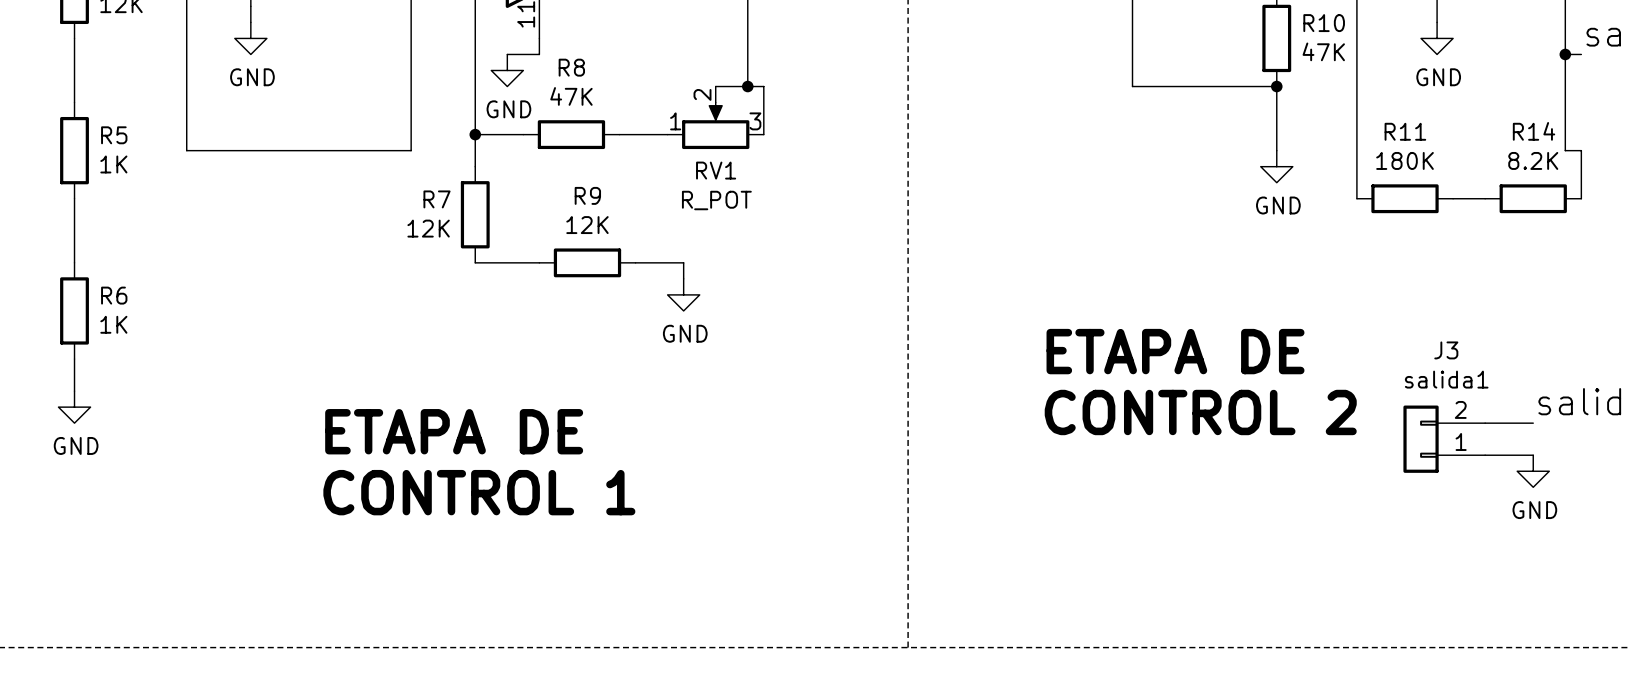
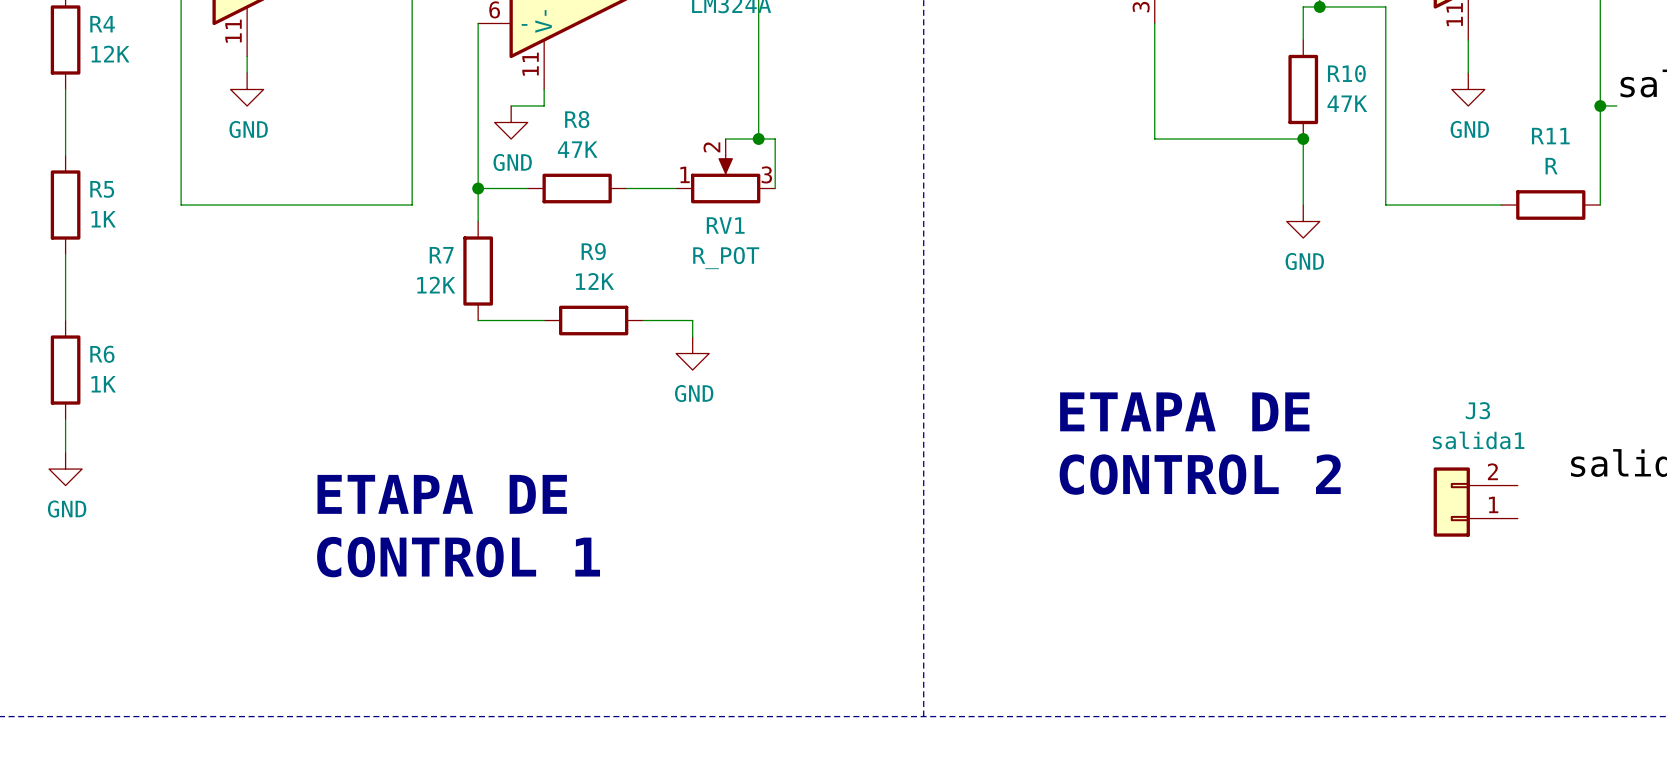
wire: (1356, 150) (1356, 198) -> (1385, 205) (1501, 205)
wire: (1565, 150) (1581, 150) (1581, 198) -> none
R11 value: 180K (1405, 160) -> R (1551, 166)
R11 position: (1405, 198) -> (1550, 205)
wire: (1453, 198) (1485, 198) -> none
R14: 8.2K (1533, 198) -> none
wire: (1485, 423) (1533, 423) -> none
wire: (1485, 455) (1533, 455) -> none
power symbol: GND (1533, 471) -> none

